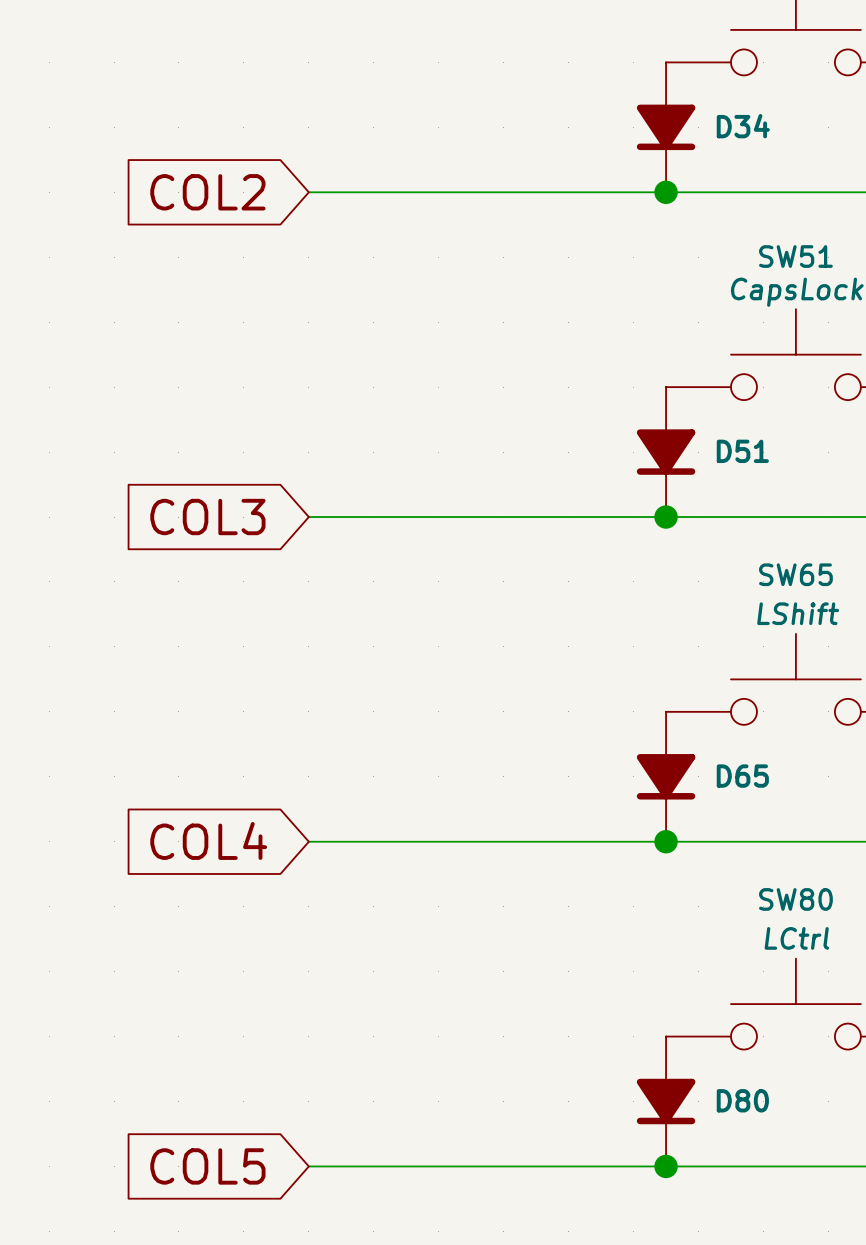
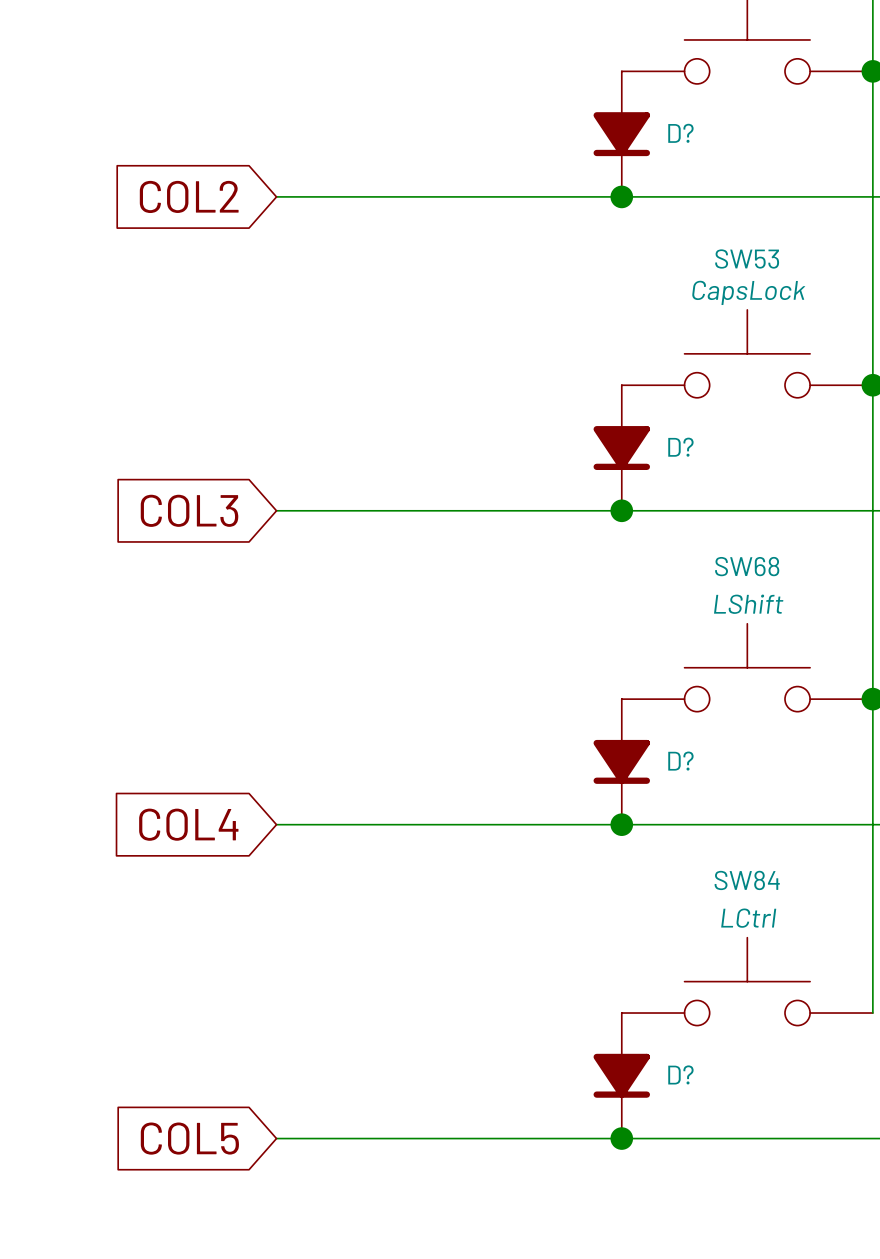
D34 name: D34 (743, 126) -> D? (680, 133)
SW51 name: SW51 (795, 256) -> SW53 (747, 258)
D51 name: D51 (742, 451) -> D? (680, 447)
SW65 name: SW65 (795, 574) -> SW68 (747, 566)
D65 name: D65 (742, 776) -> D? (680, 761)
SW80 name: SW80 (795, 899) -> SW84 (747, 880)
D80 name: D80 (742, 1100) -> D? (680, 1074)

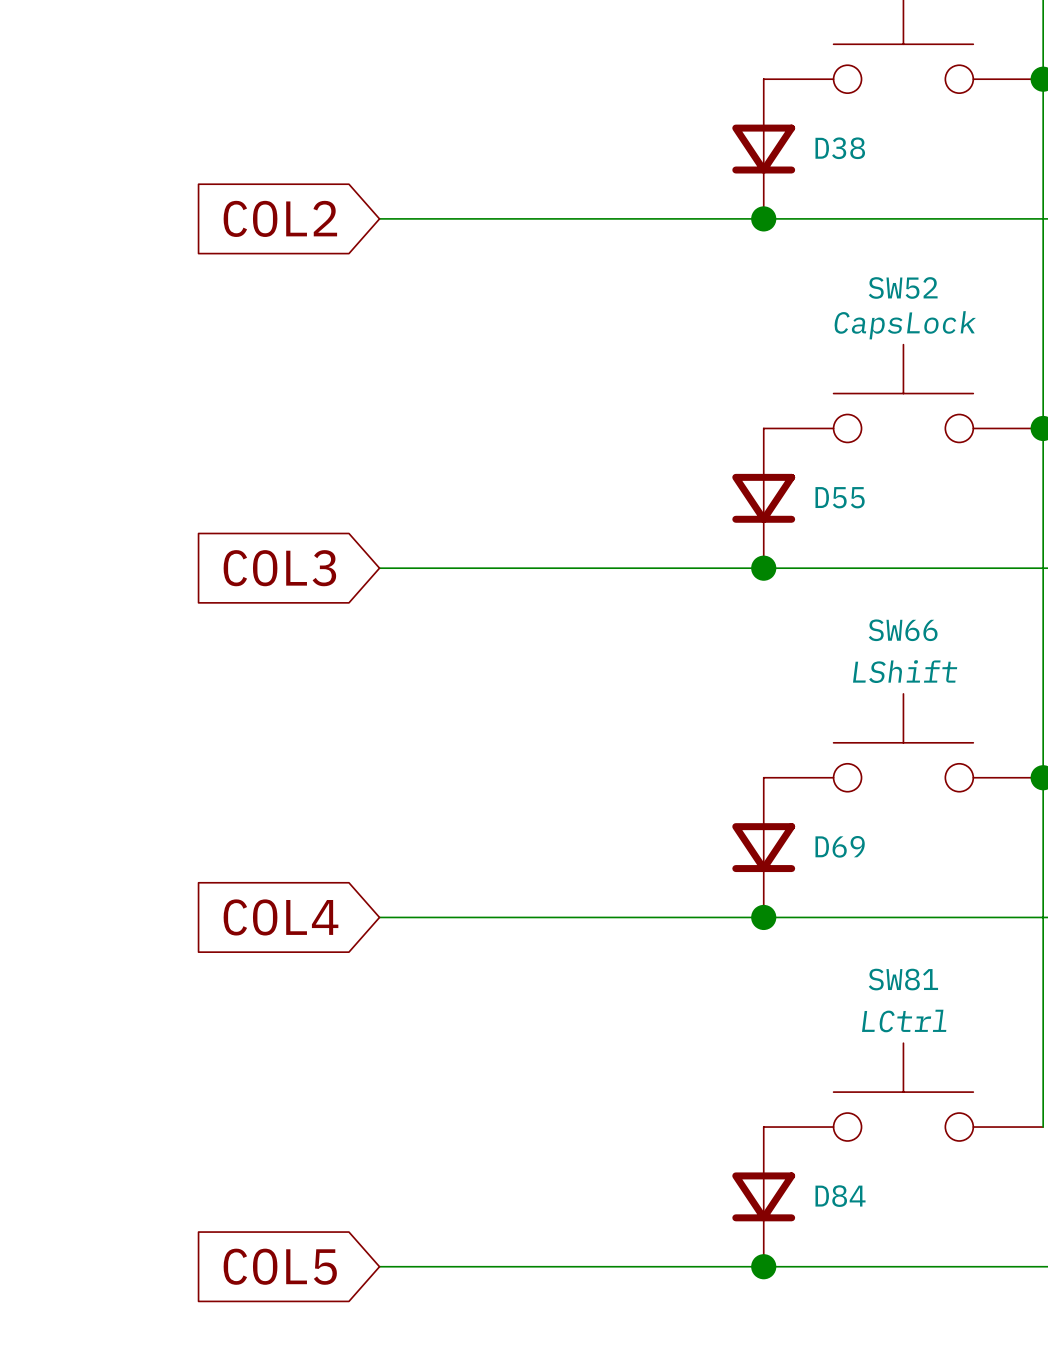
D?: (621, 134) -> none
D38: none -> (763, 149)
SW53 name: SW53 (747, 258) -> SW52 (903, 287)
D?: (621, 448) -> none
D55: none -> (763, 498)
SW68 name: SW68 (747, 566) -> SW66 (903, 630)
D?: (621, 761) -> none
D69: none -> (763, 847)
SW84 name: SW84 (747, 880) -> SW81 (903, 979)
D?: (621, 1075) -> none
D84: none -> (763, 1196)

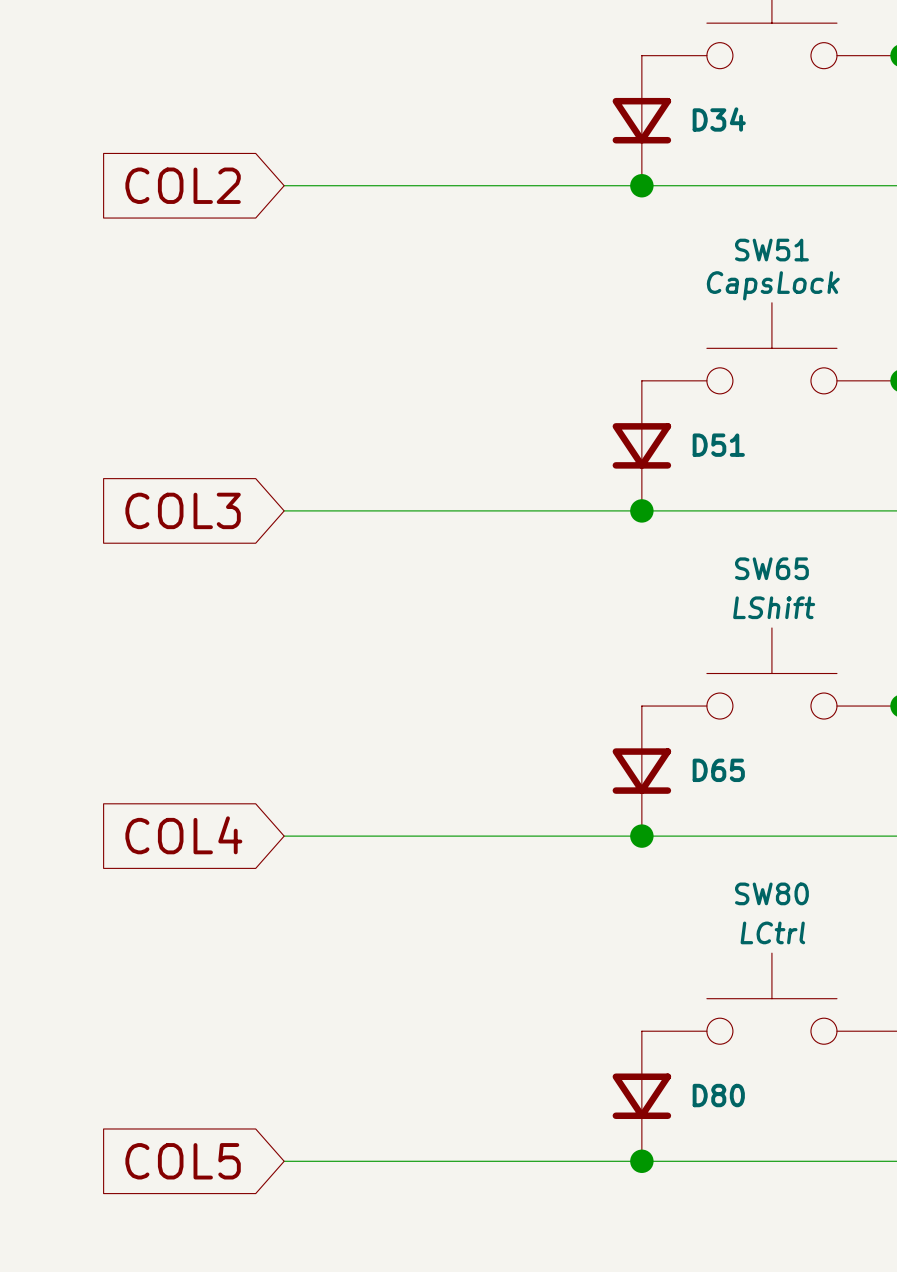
D38 name: D38 (840, 148) -> D34 (719, 119)
SW52 name: SW52 (903, 287) -> SW51 (771, 250)
D55 name: D55 (840, 497) -> D51 (718, 445)
SW66 name: SW66 (903, 630) -> SW65 (771, 568)
D69 name: D69 (840, 846) -> D65 (718, 770)
SW81 name: SW81 (903, 979) -> SW80 (771, 893)
D84 name: D84 (840, 1196) -> D80 (718, 1095)

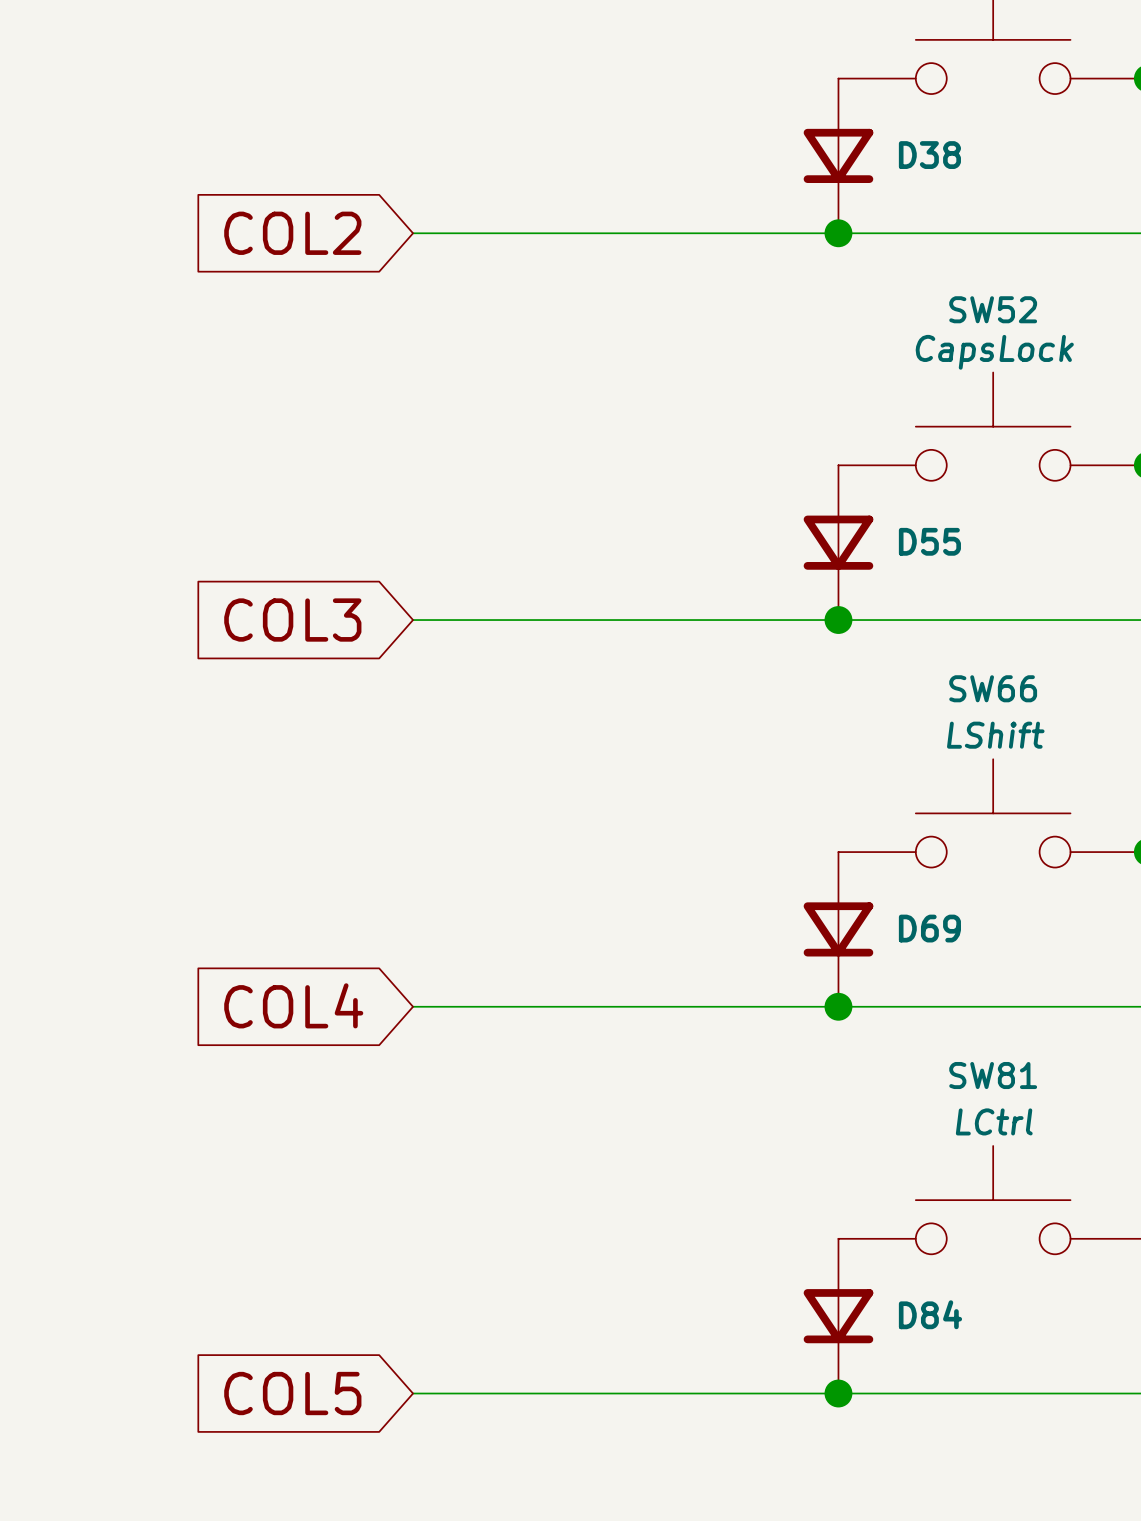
D34 name: D34 (719, 119) -> D38 (929, 155)
SW51 name: SW51 (771, 250) -> SW52 (993, 309)
D51 name: D51 (718, 445) -> D55 (929, 541)
SW65 name: SW65 (771, 568) -> SW66 (993, 688)
D65 name: D65 (718, 770) -> D69 (929, 928)
SW80 name: SW80 (771, 893) -> SW81 (993, 1075)
D80 name: D80 (718, 1095) -> D84 (930, 1314)

